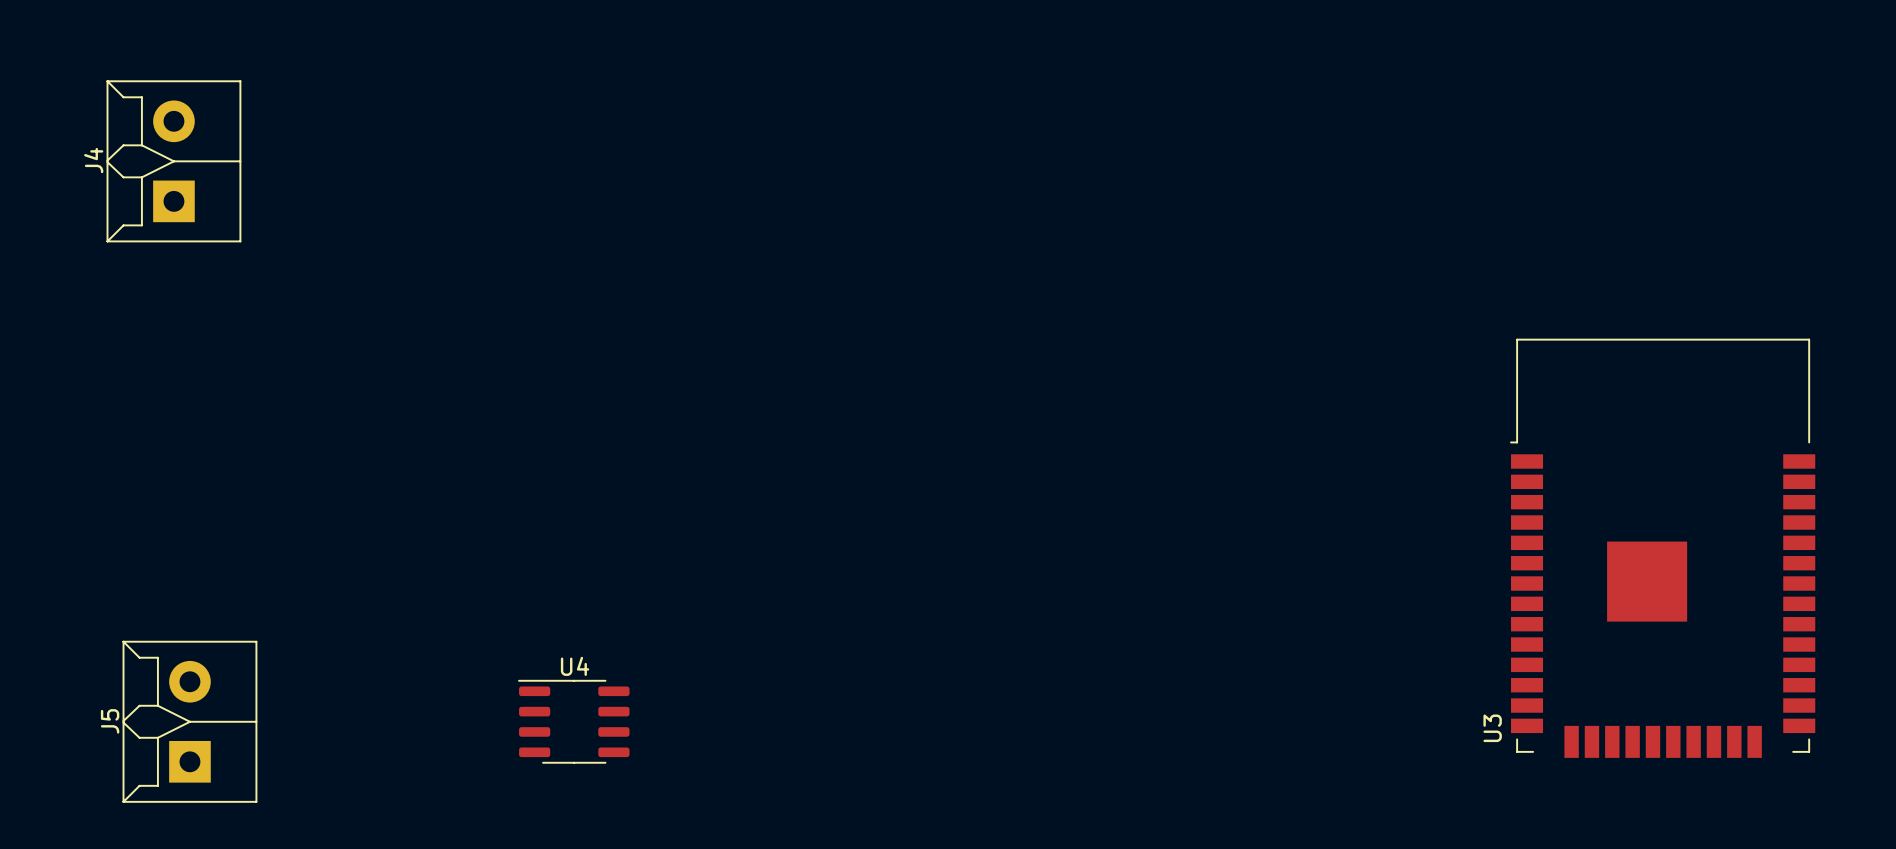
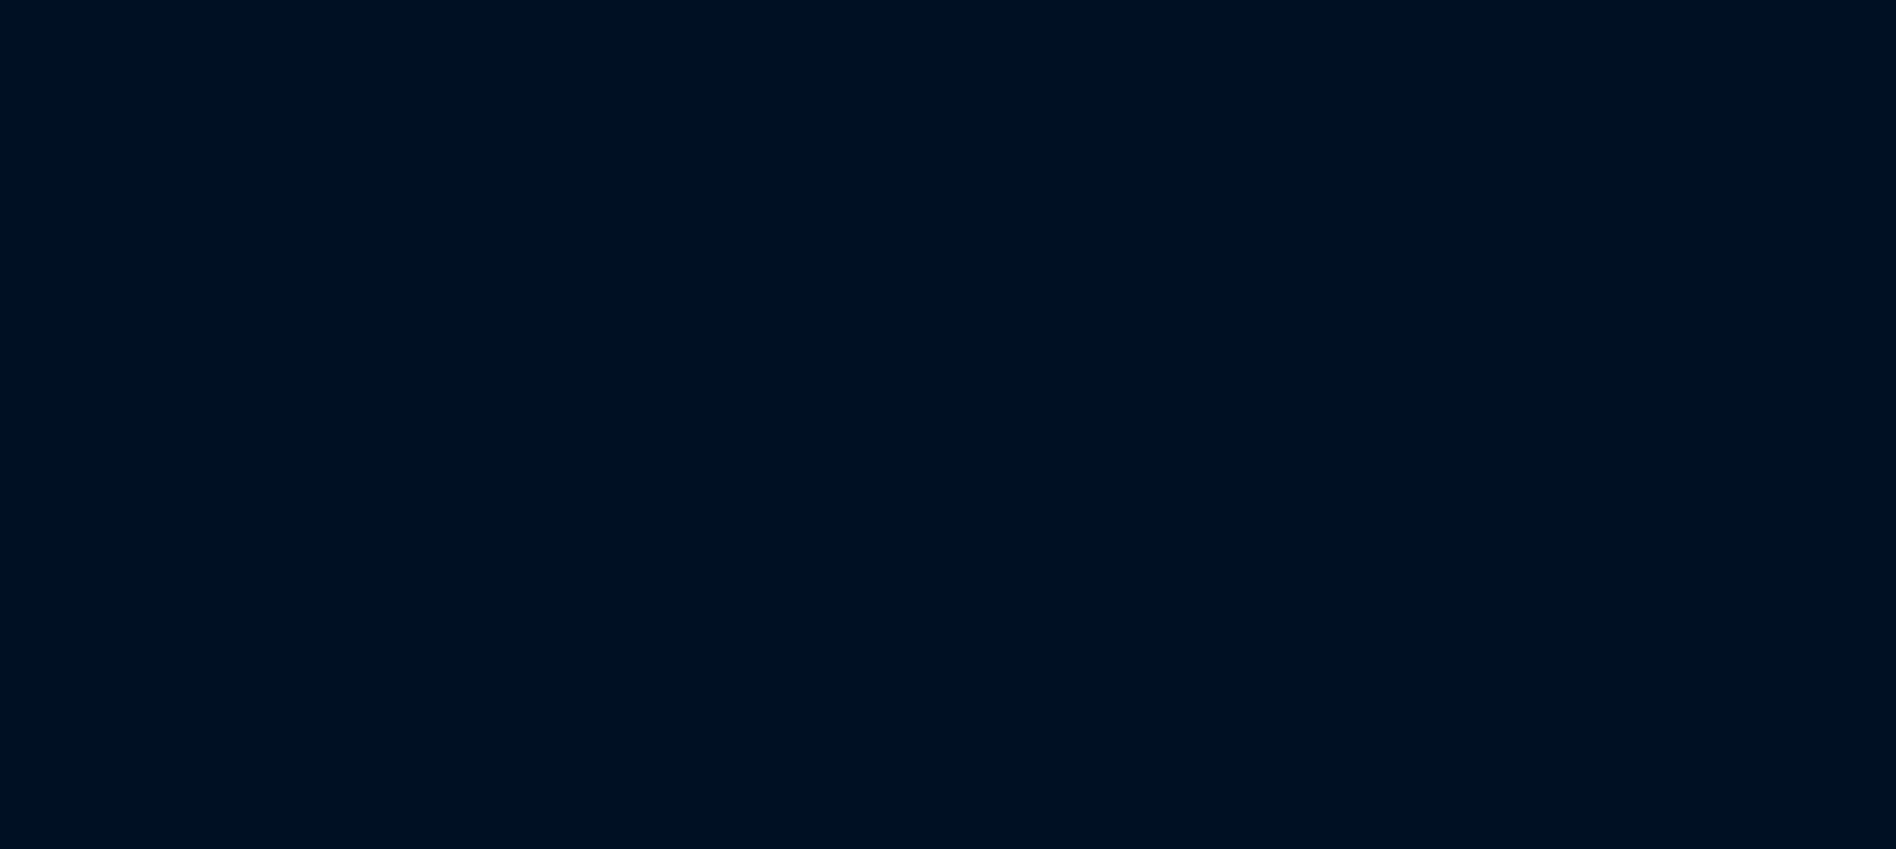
J4: (173, 161) -> none
U3: (1662, 548) -> none
J5: (189, 721) -> none
U4: (573, 721) -> none

